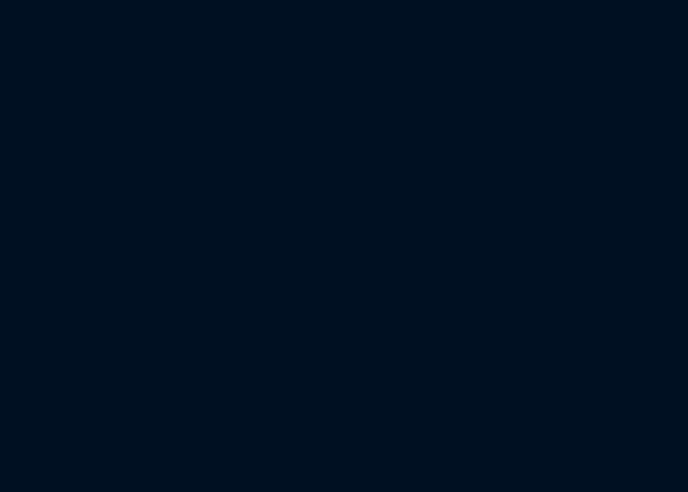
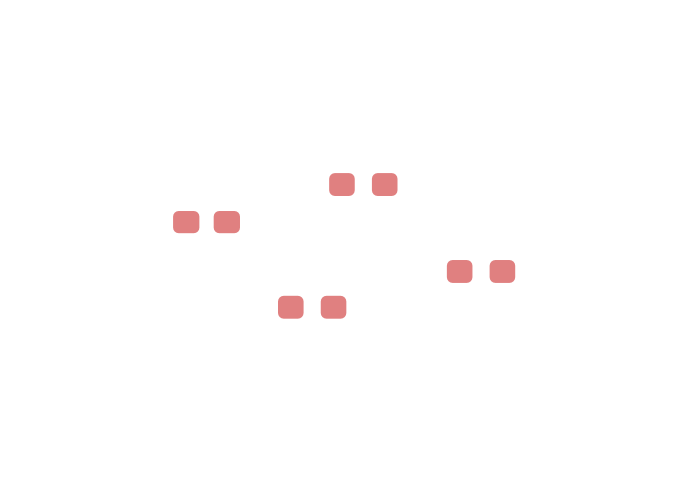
part: none -> (363, 184)
part: none -> (206, 222)
part: none -> (481, 271)
part: none -> (312, 307)

